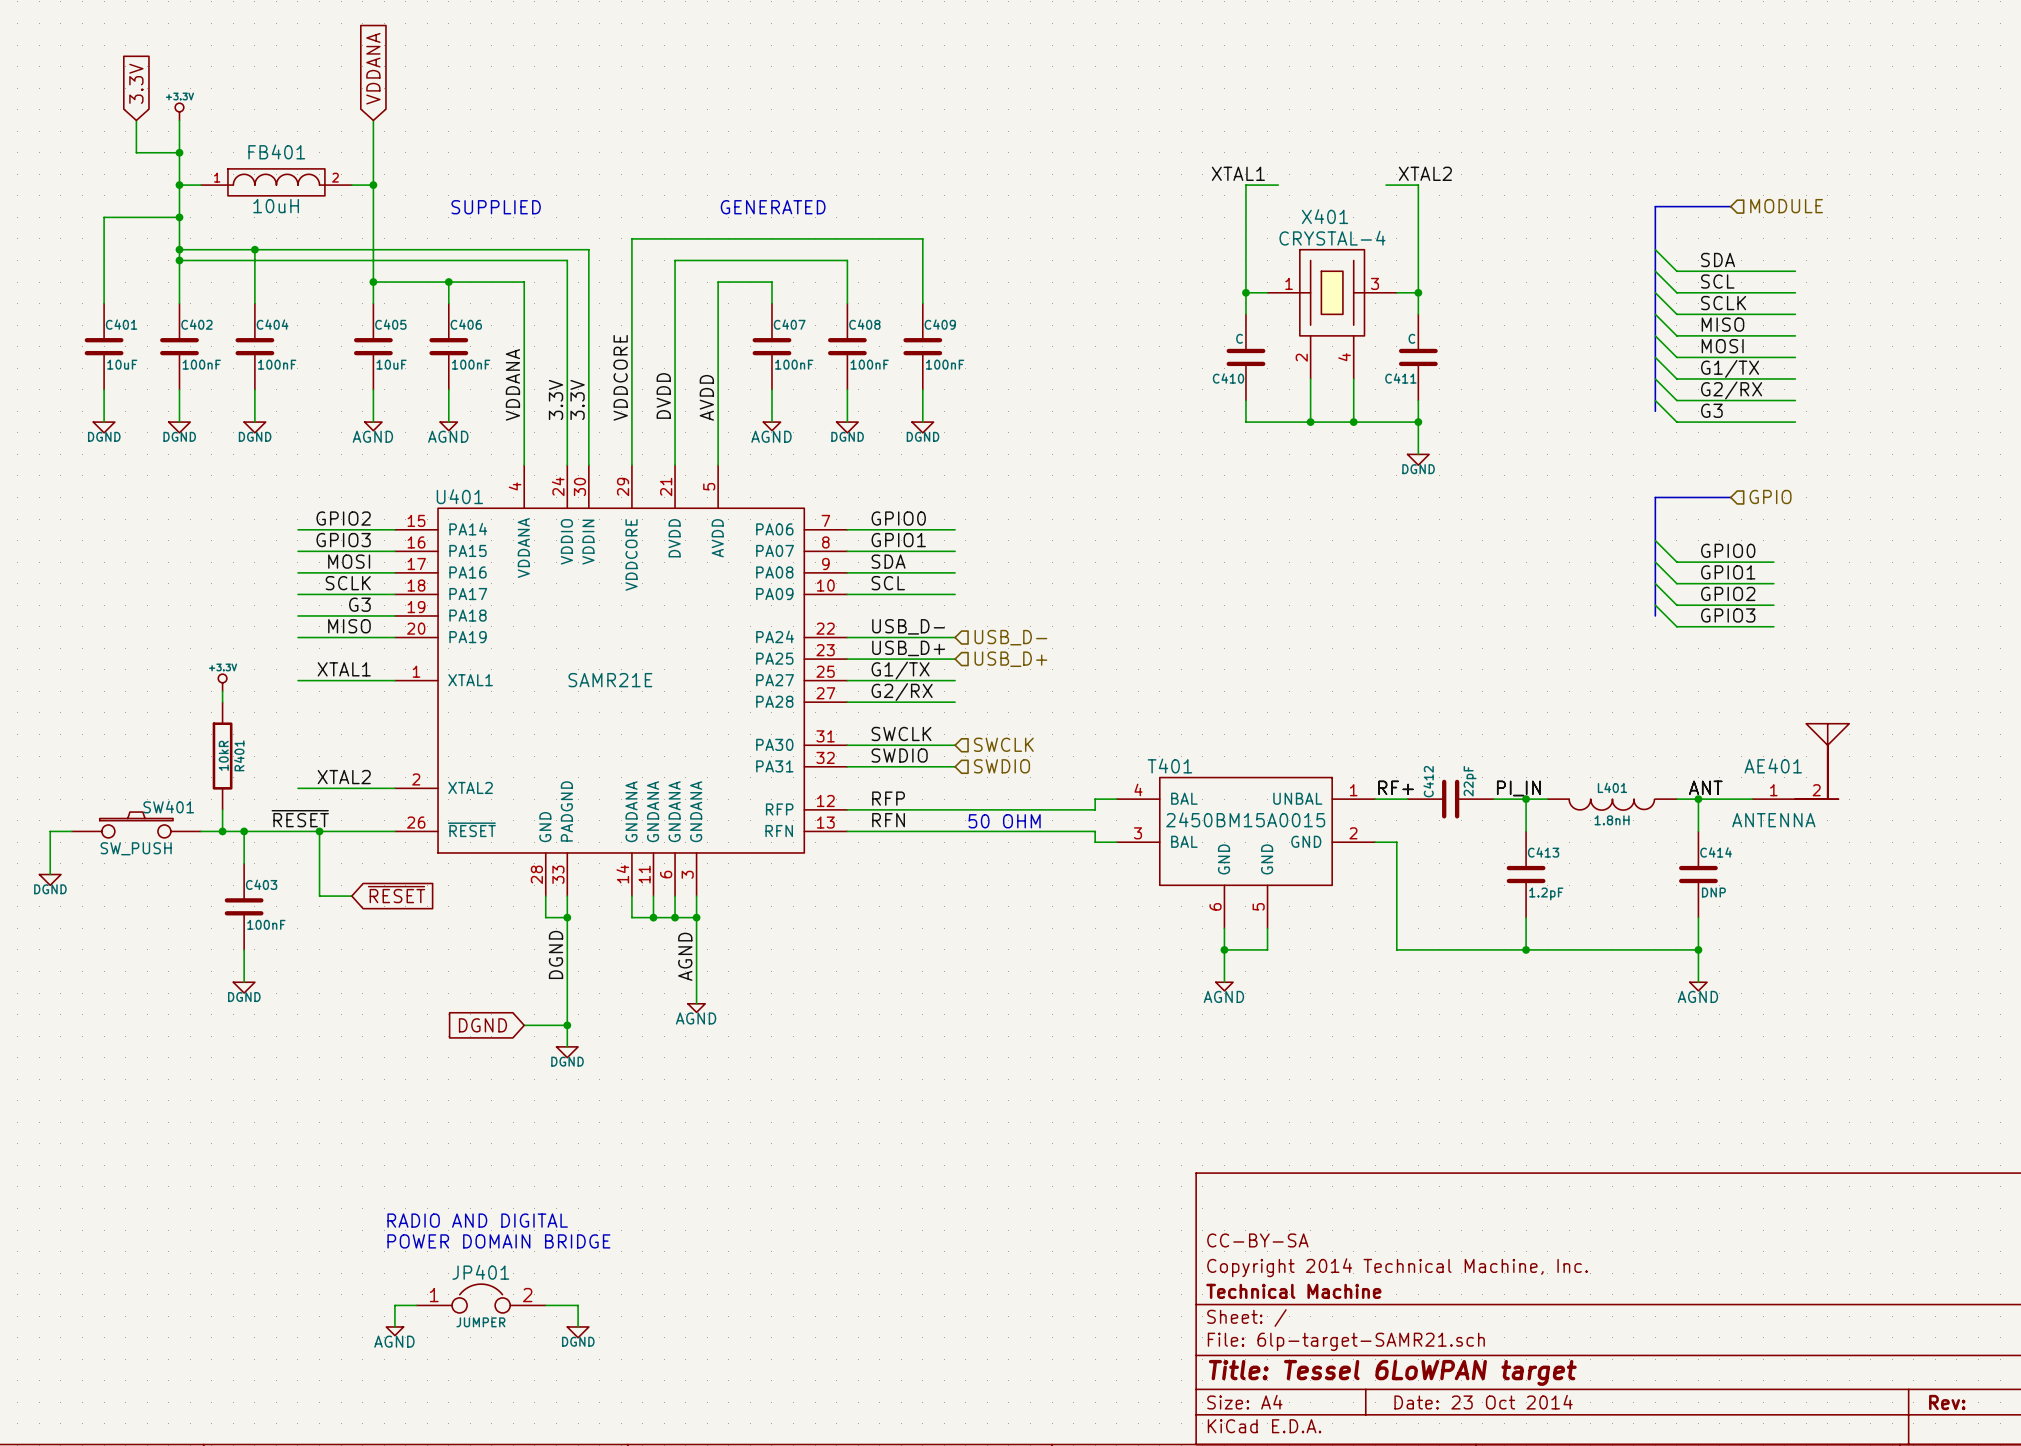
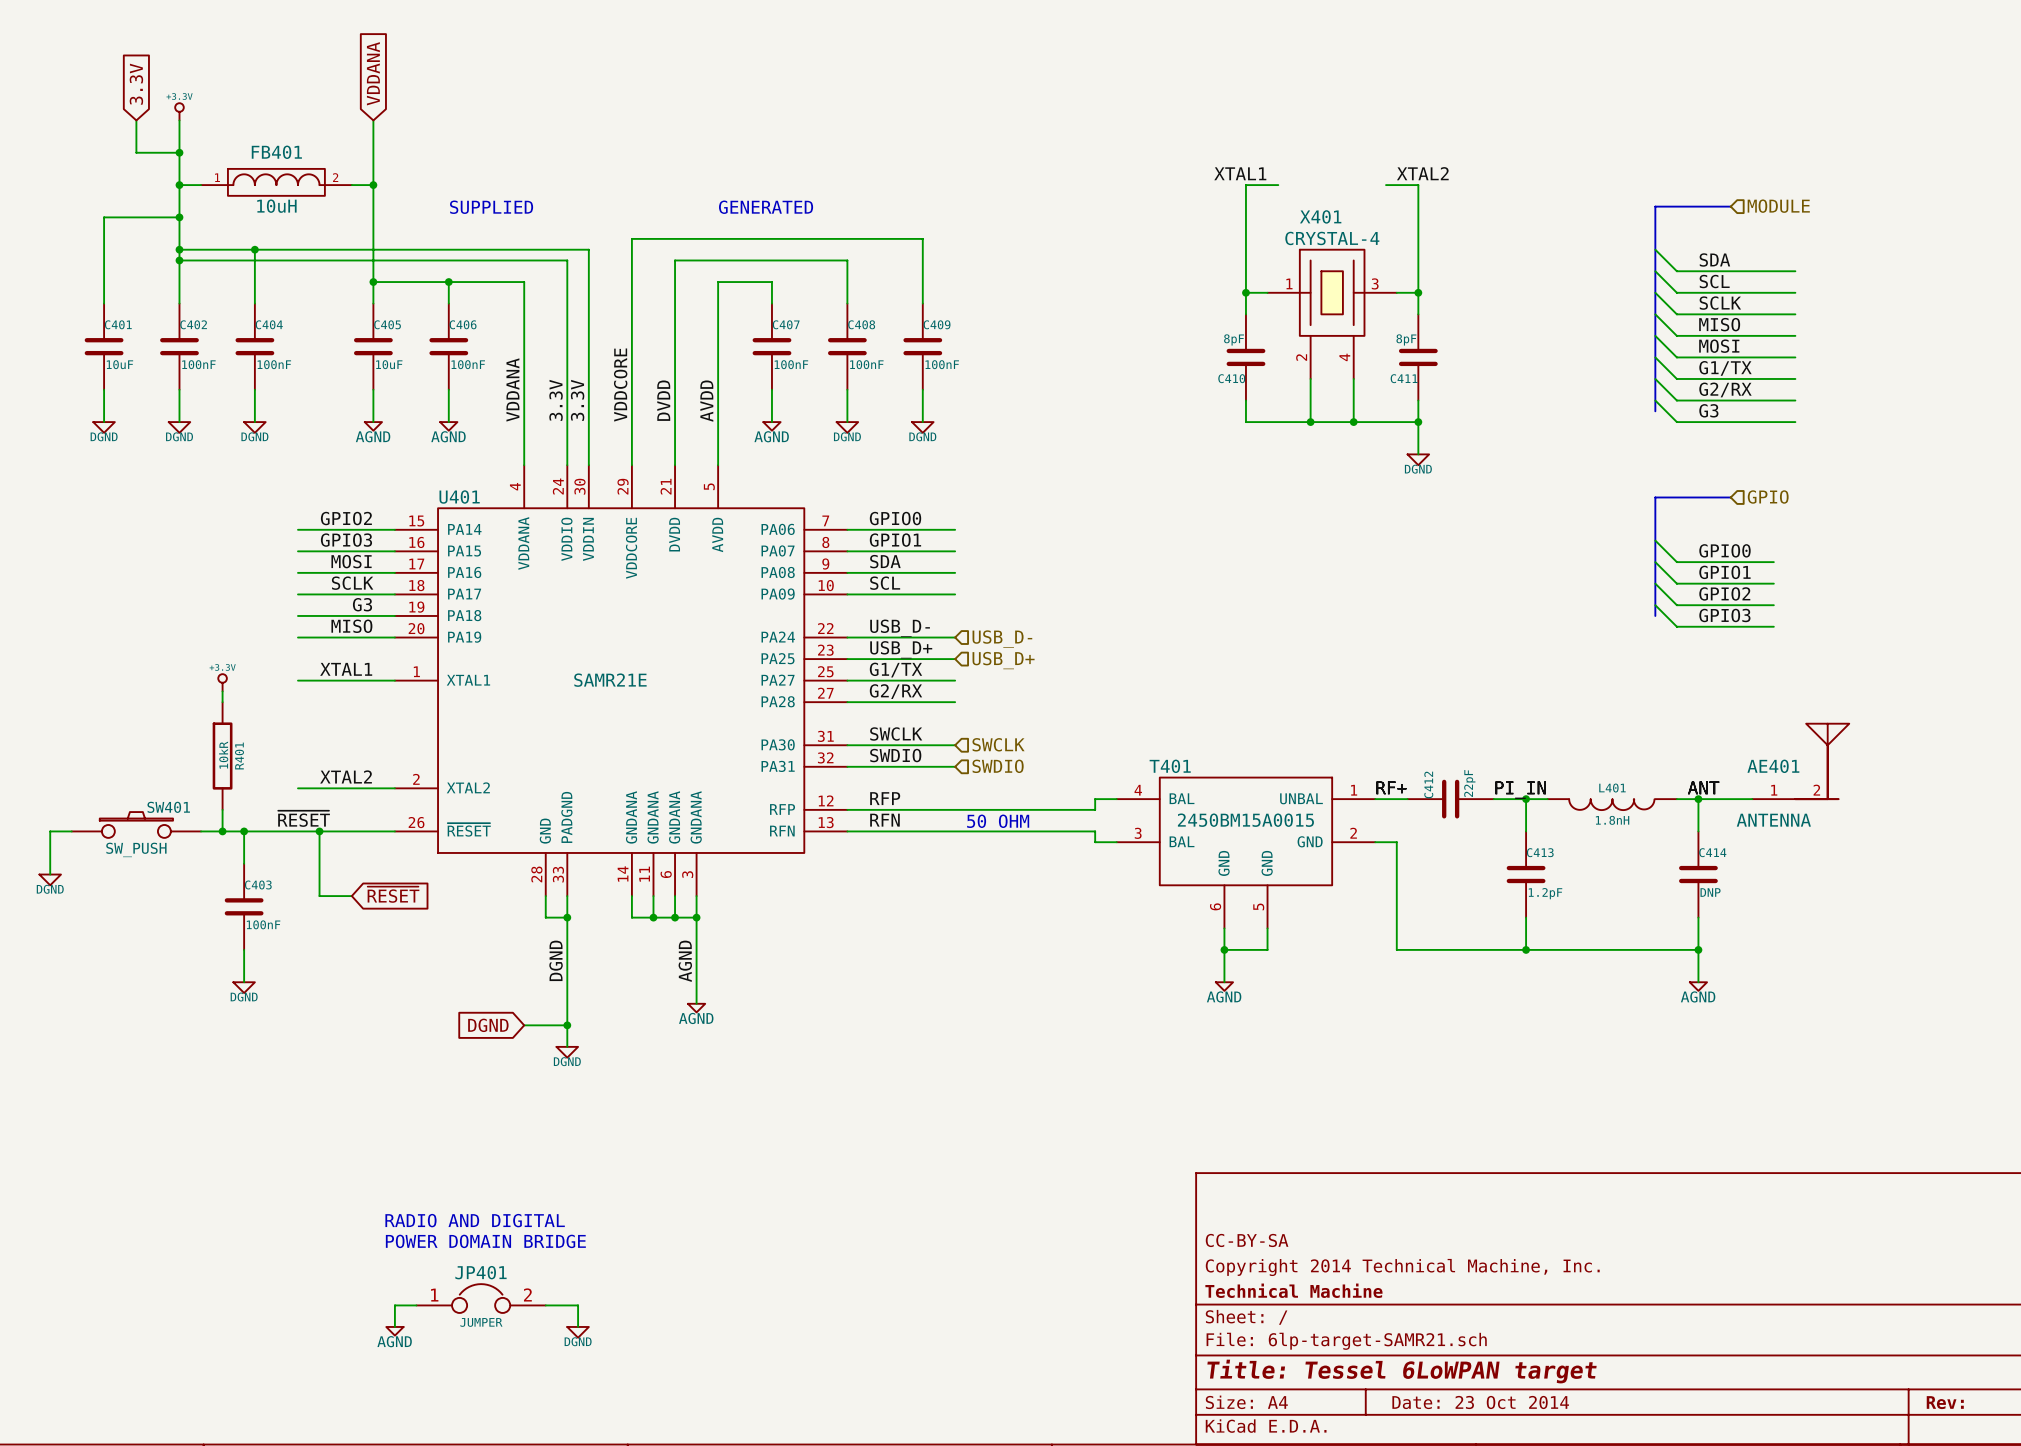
C410 value: C (1239, 338) -> 8pF (1234, 339)
C411 value: C (1411, 338) -> 8pF (1406, 339)

